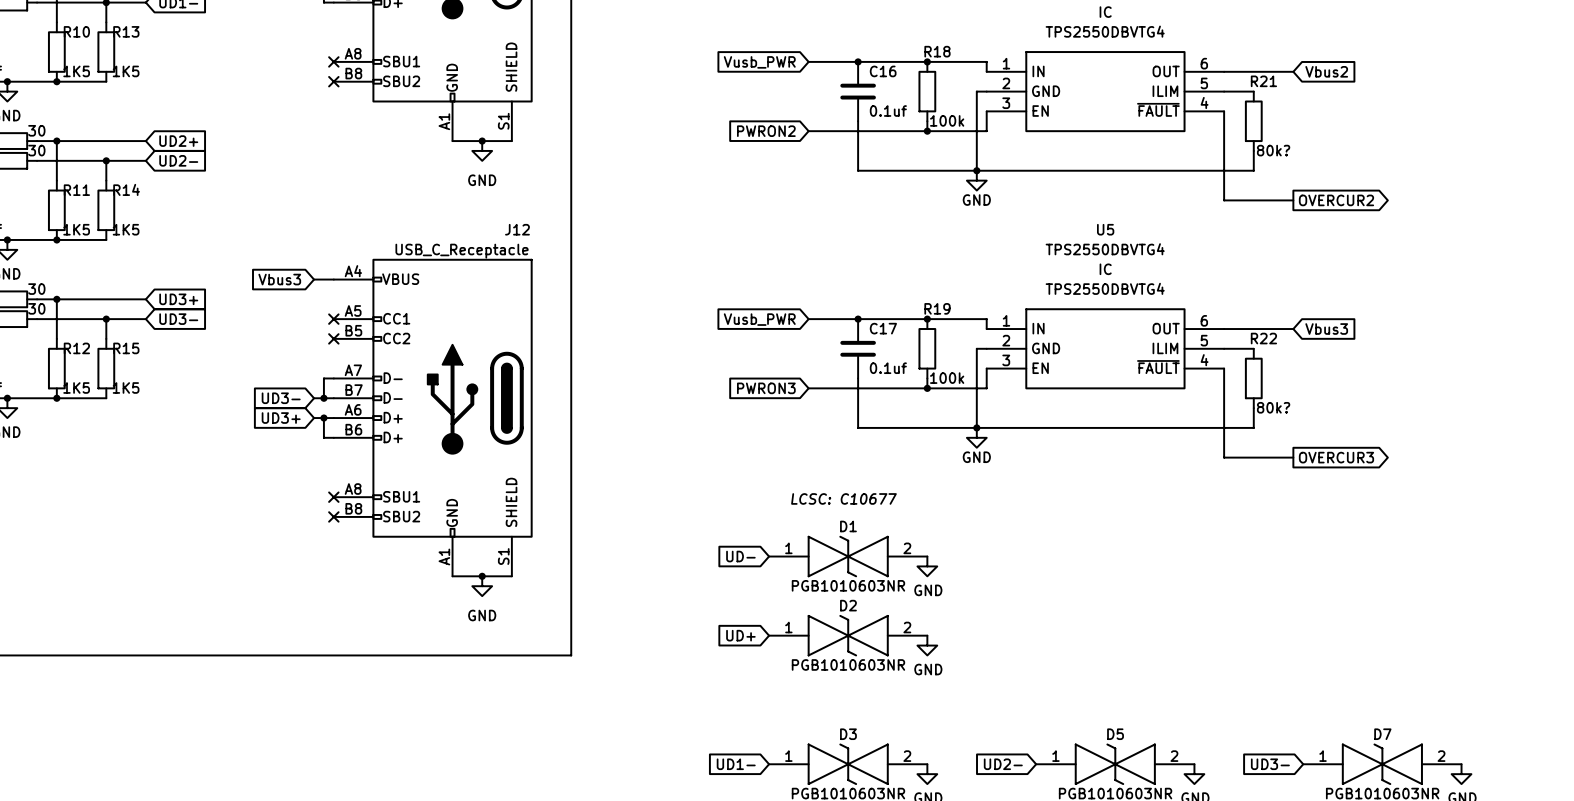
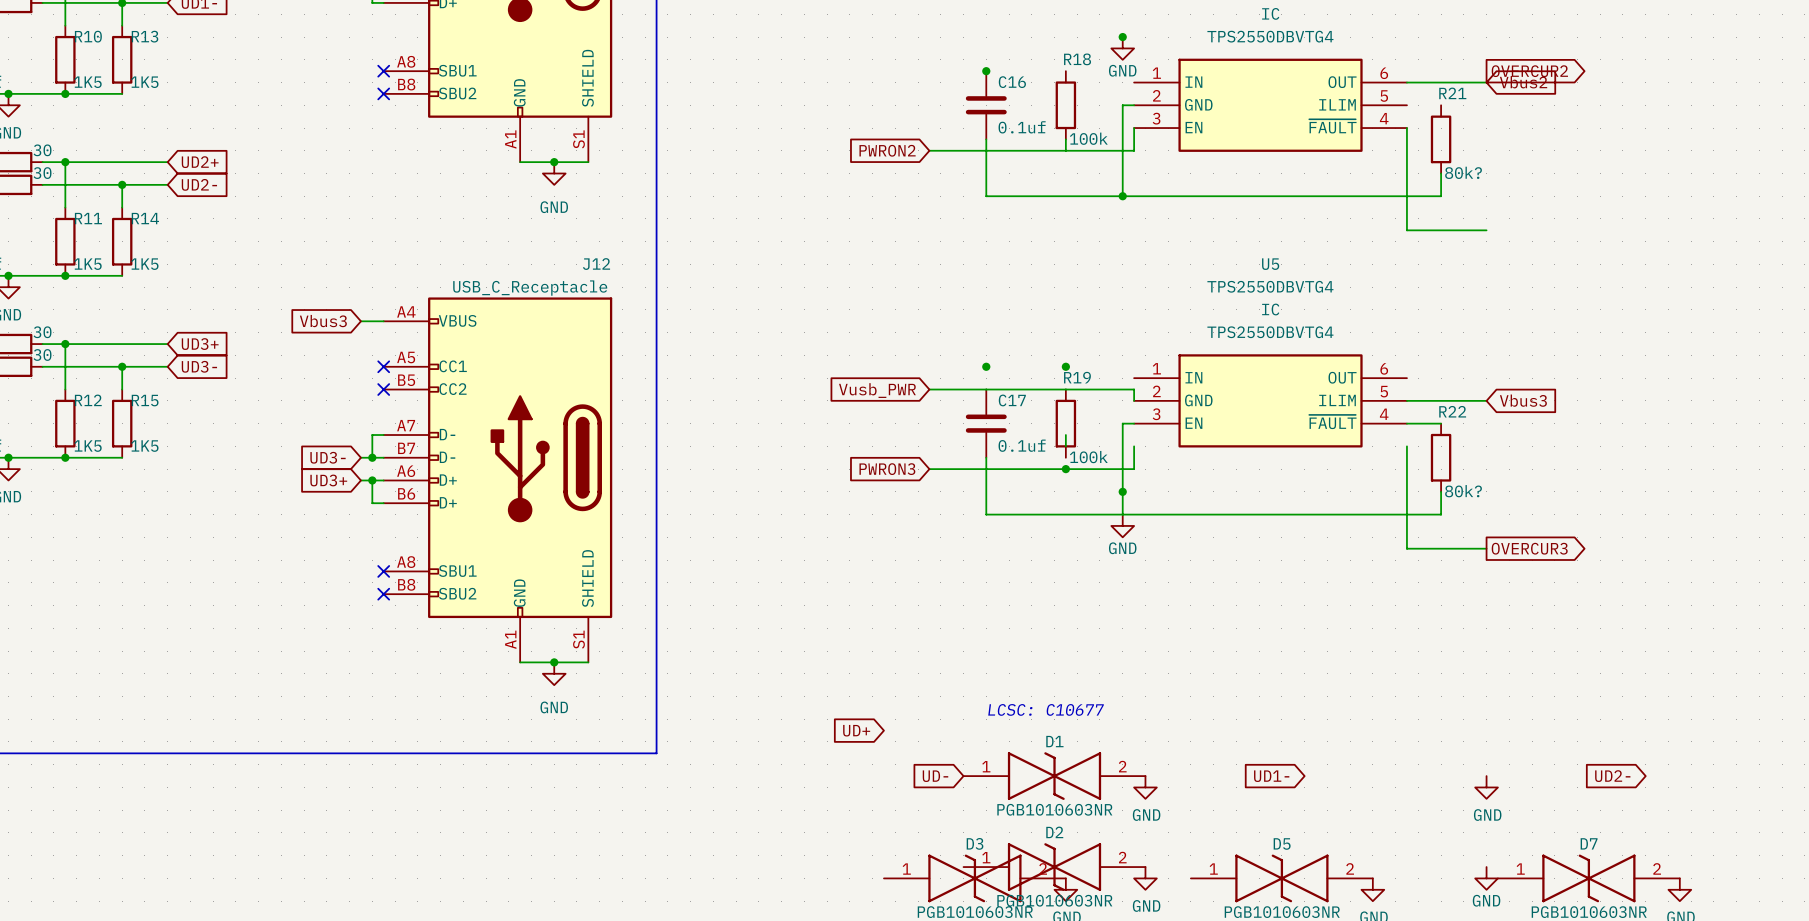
junction: none -> (1122, 37)
power symbol: none -> GND (1122, 48)
wire: (808, 61) (986, 61) (986, 71) -> none
junction: (927, 61) -> none
global label: Vusb_PWR (759, 62) -> none
wire: (1224, 91) (1253, 91) -> none
junction: (927, 131) -> none
power symbol: GND (976, 180) -> none
global label position: OVERCUR2 (1336, 200) -> OVERCUR2 (1529, 71)
global label position: Vusb_PWR (759, 319) -> Vusb_PWR (877, 390)
wire: (808, 319) (986, 319) (986, 329) -> (929, 389) (1134, 389) (1134, 400)
wire: (1224, 329) (1293, 329) -> none
global label position: Vbus3 (1326, 329) -> Vbus3 (1523, 400)
C17 position: (858, 348) -> (986, 423)
R19 position: (927, 348) -> (1065, 423)
wire: (986, 348) (976, 348) (976, 368) -> (1134, 423) (1122, 423)
wire: none -> (1441, 400) (1486, 400)
wire: (986, 368) (986, 388) (808, 388) -> (1134, 446) (1134, 469) (929, 469)
wire: (1224, 368) (1224, 388) -> (1406, 423) (1441, 423)
R22 position: (1253, 378) -> (1441, 457)
global label position: PWRON3 (766, 388) -> PWRON3 (887, 469)
junction position: (927, 388) -> (1065, 469)
wire: (1253, 408) (1253, 427) (858, 427) -> (1441, 491) (1441, 514) (986, 514) (986, 491)
power symbol position: GND (976, 437) -> GND (1122, 525)
wire: (1224, 457) (1293, 457) -> (1406, 525) (1406, 548) (1486, 548)
global label position: OVERCUR3 (1336, 457) -> OVERCUR3 (1529, 548)
text position: LCSC: C10677 (843, 498) -> LCSC: C10677 (1046, 709)
global label position: UD- (740, 556) -> UD- (935, 776)
D1 position: (848, 556) -> (1054, 776)
power symbol: GND (927, 566) -> none
D2 position: (848, 635) -> (1054, 867)
power symbol: GND (927, 645) -> none
global label: none -> UD1- (1271, 776)
global label: none -> UD2- (1612, 776)
power symbol: none -> GND (1145, 787)
power symbol: none -> GND (1486, 787)
global label: UD1- (736, 764) -> none
power symbol: none -> GND (1145, 878)
global label: UD2- (1003, 764) -> none
global label: UD3- (1270, 764) -> none
power symbol: none -> GND (1486, 878)

